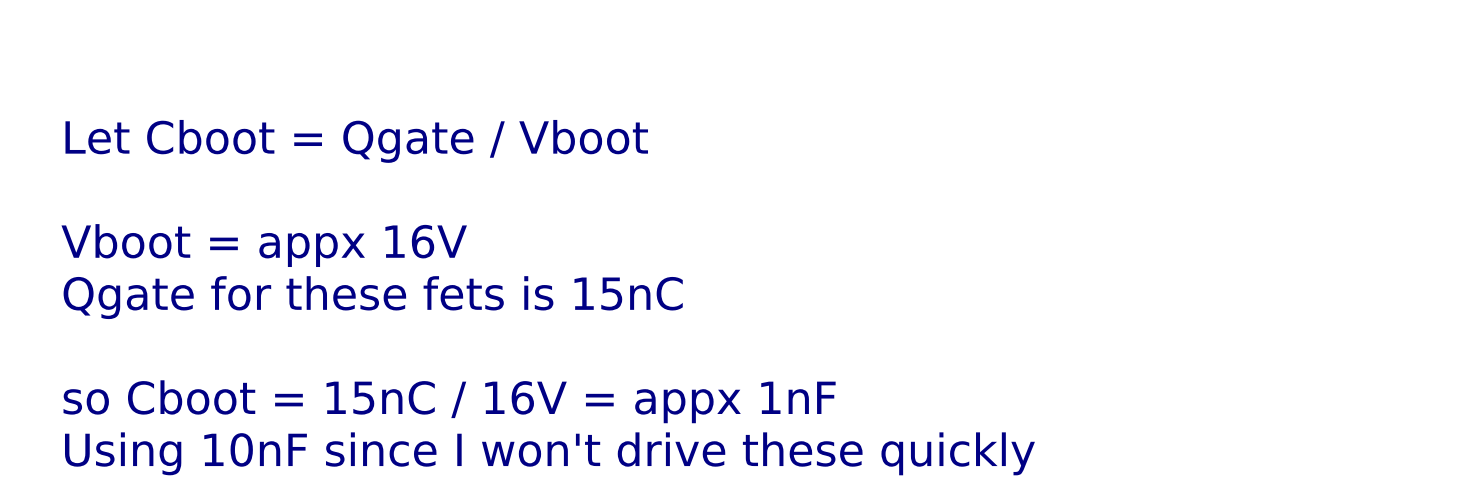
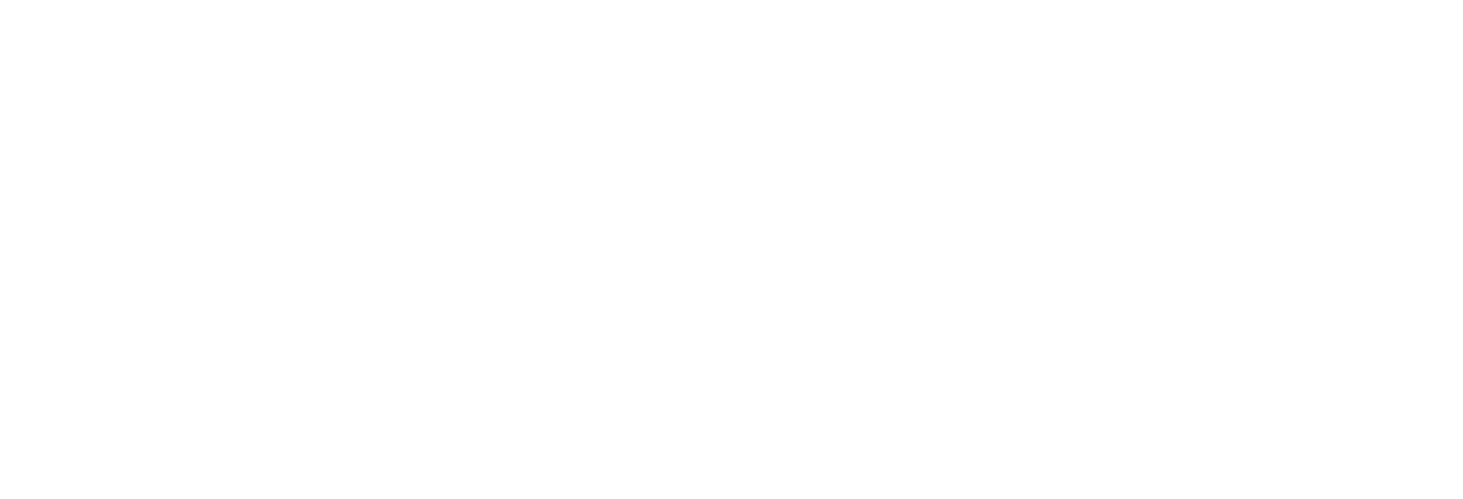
text: Let Cboot = Qgate / Vboot (356, 141) -> none
text: Vboot = appx 16V (264, 245) -> none
text: Qgate for these fets is 15nC (373, 297) -> none
text: so Cboot = 15nC / 16V = appx 1nF (449, 401) -> none
text: Using 10nF since I won't drive these quickly (549, 453) -> none

